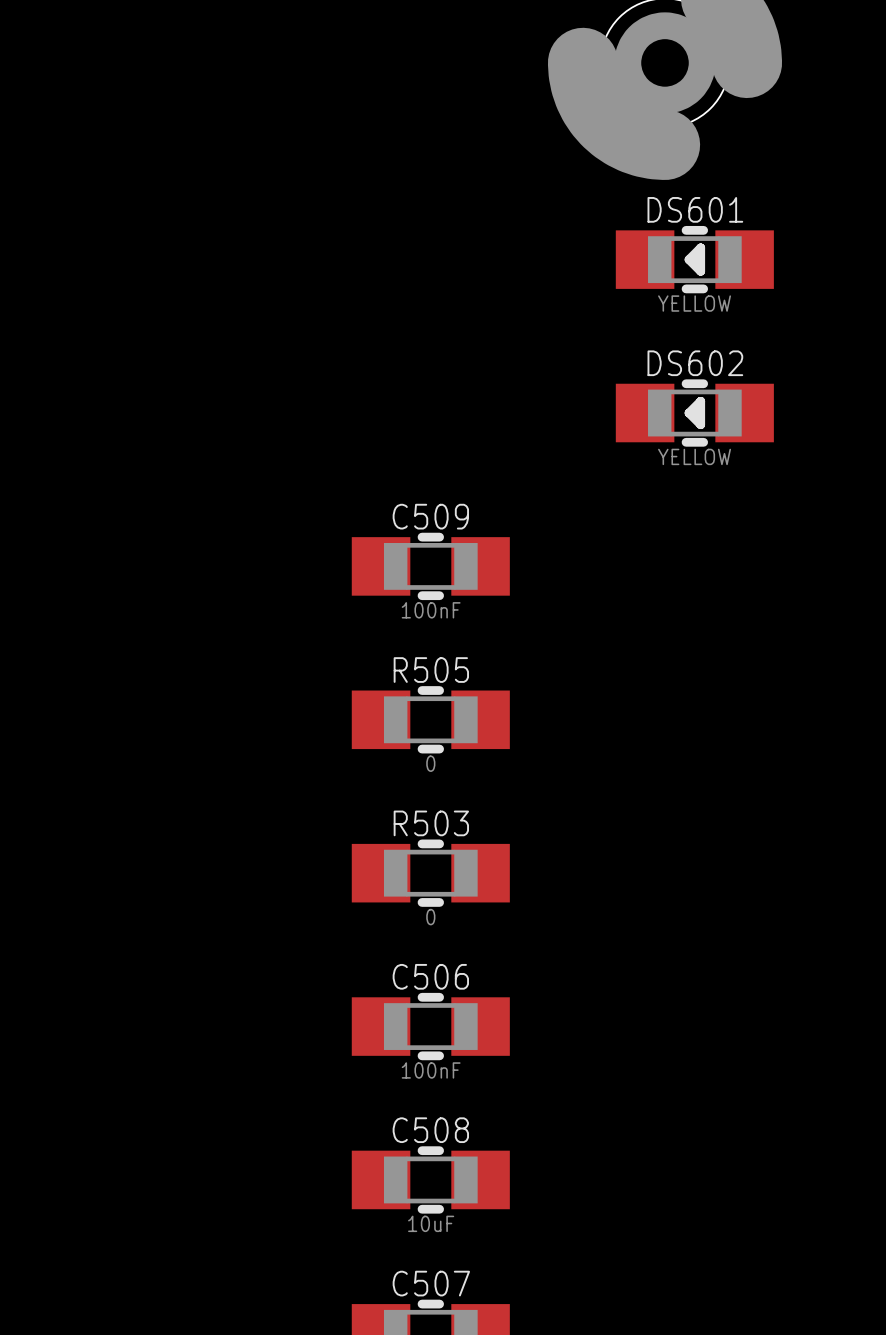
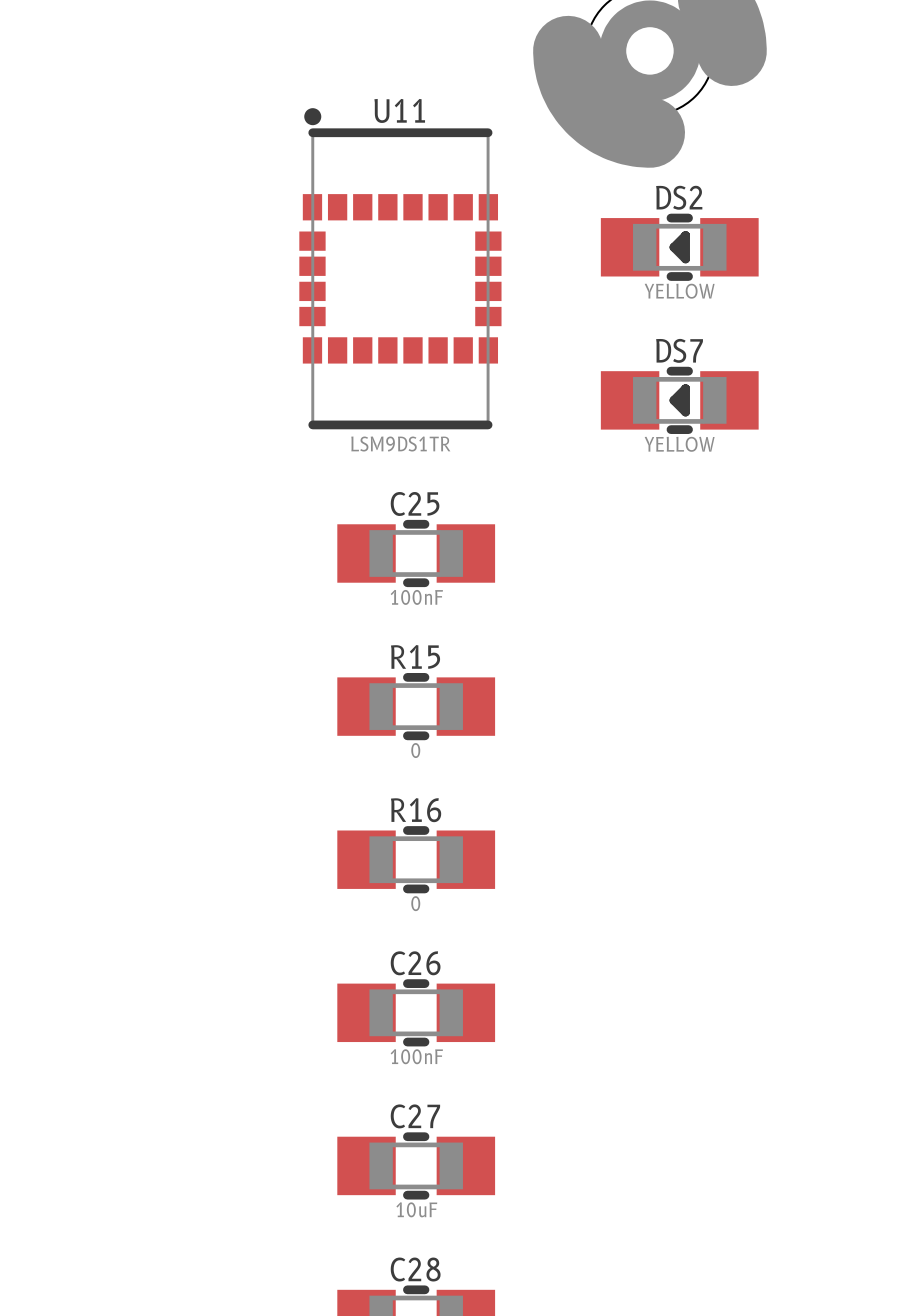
DS601 name: DS601 (695, 209) -> DS2 (679, 197)
U11: none -> LSM9DS1TR (400, 268)
DS602 name: DS602 (695, 363) -> DS7 (679, 350)
C509 name: C509 (430, 516) -> C25 (415, 503)
R505 name: R505 (431, 670) -> R15 (415, 656)
R503 name: R503 (431, 823) -> R16 (416, 810)
C506 name: C506 (430, 976) -> C26 (415, 963)
C508 name: C508 (430, 1130) -> C27 (415, 1116)
C507 name: C507 (431, 1283) -> C28 (415, 1269)

